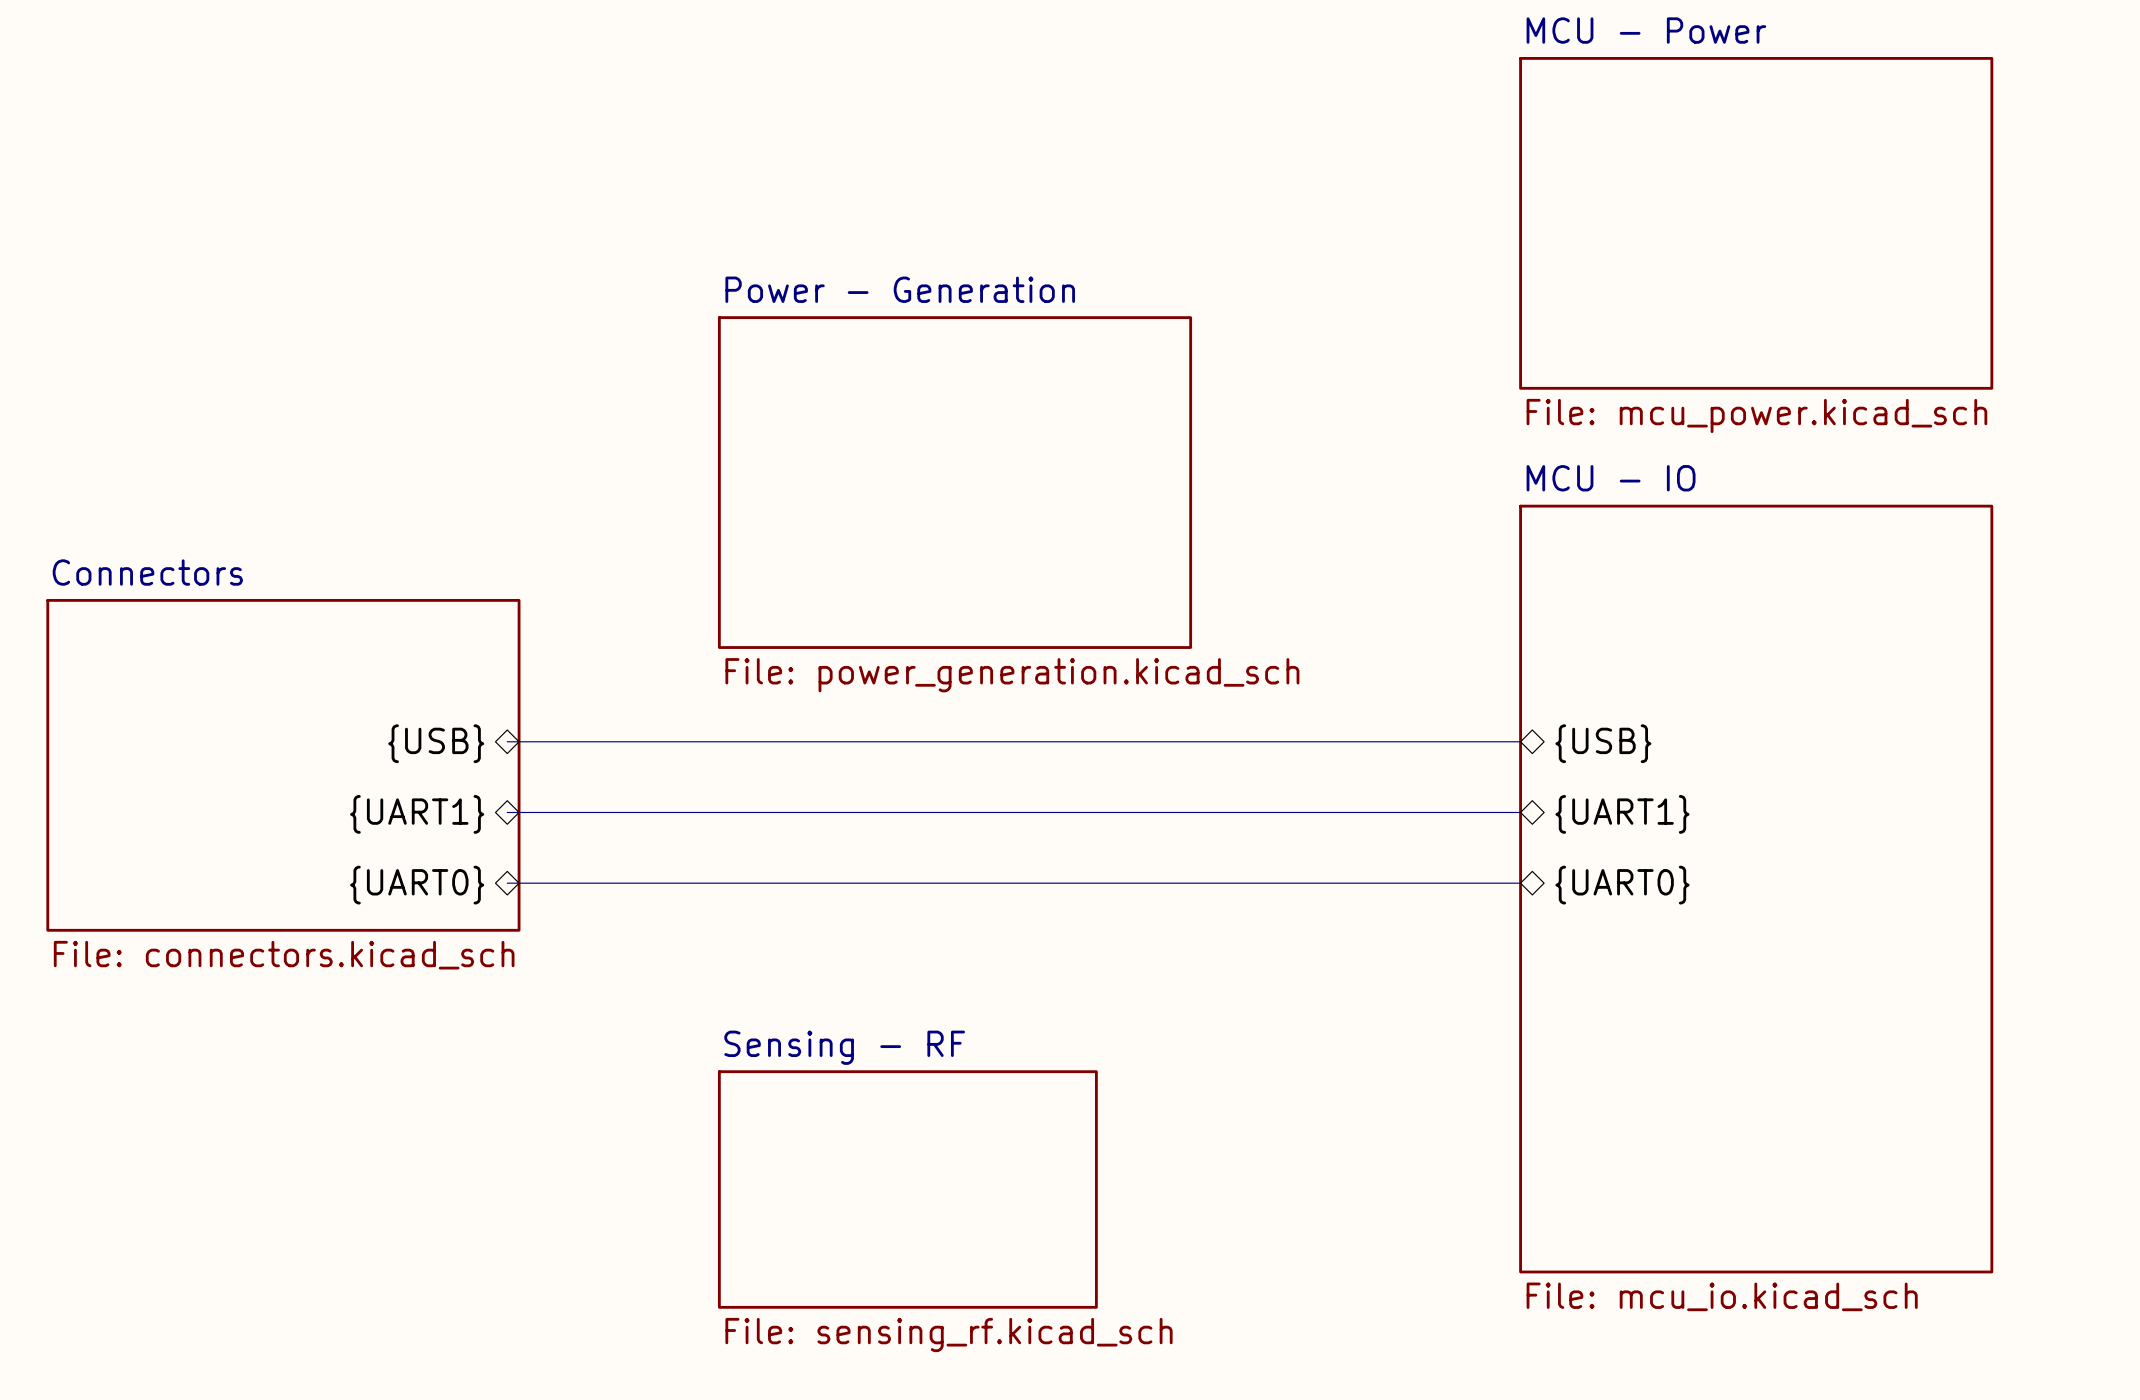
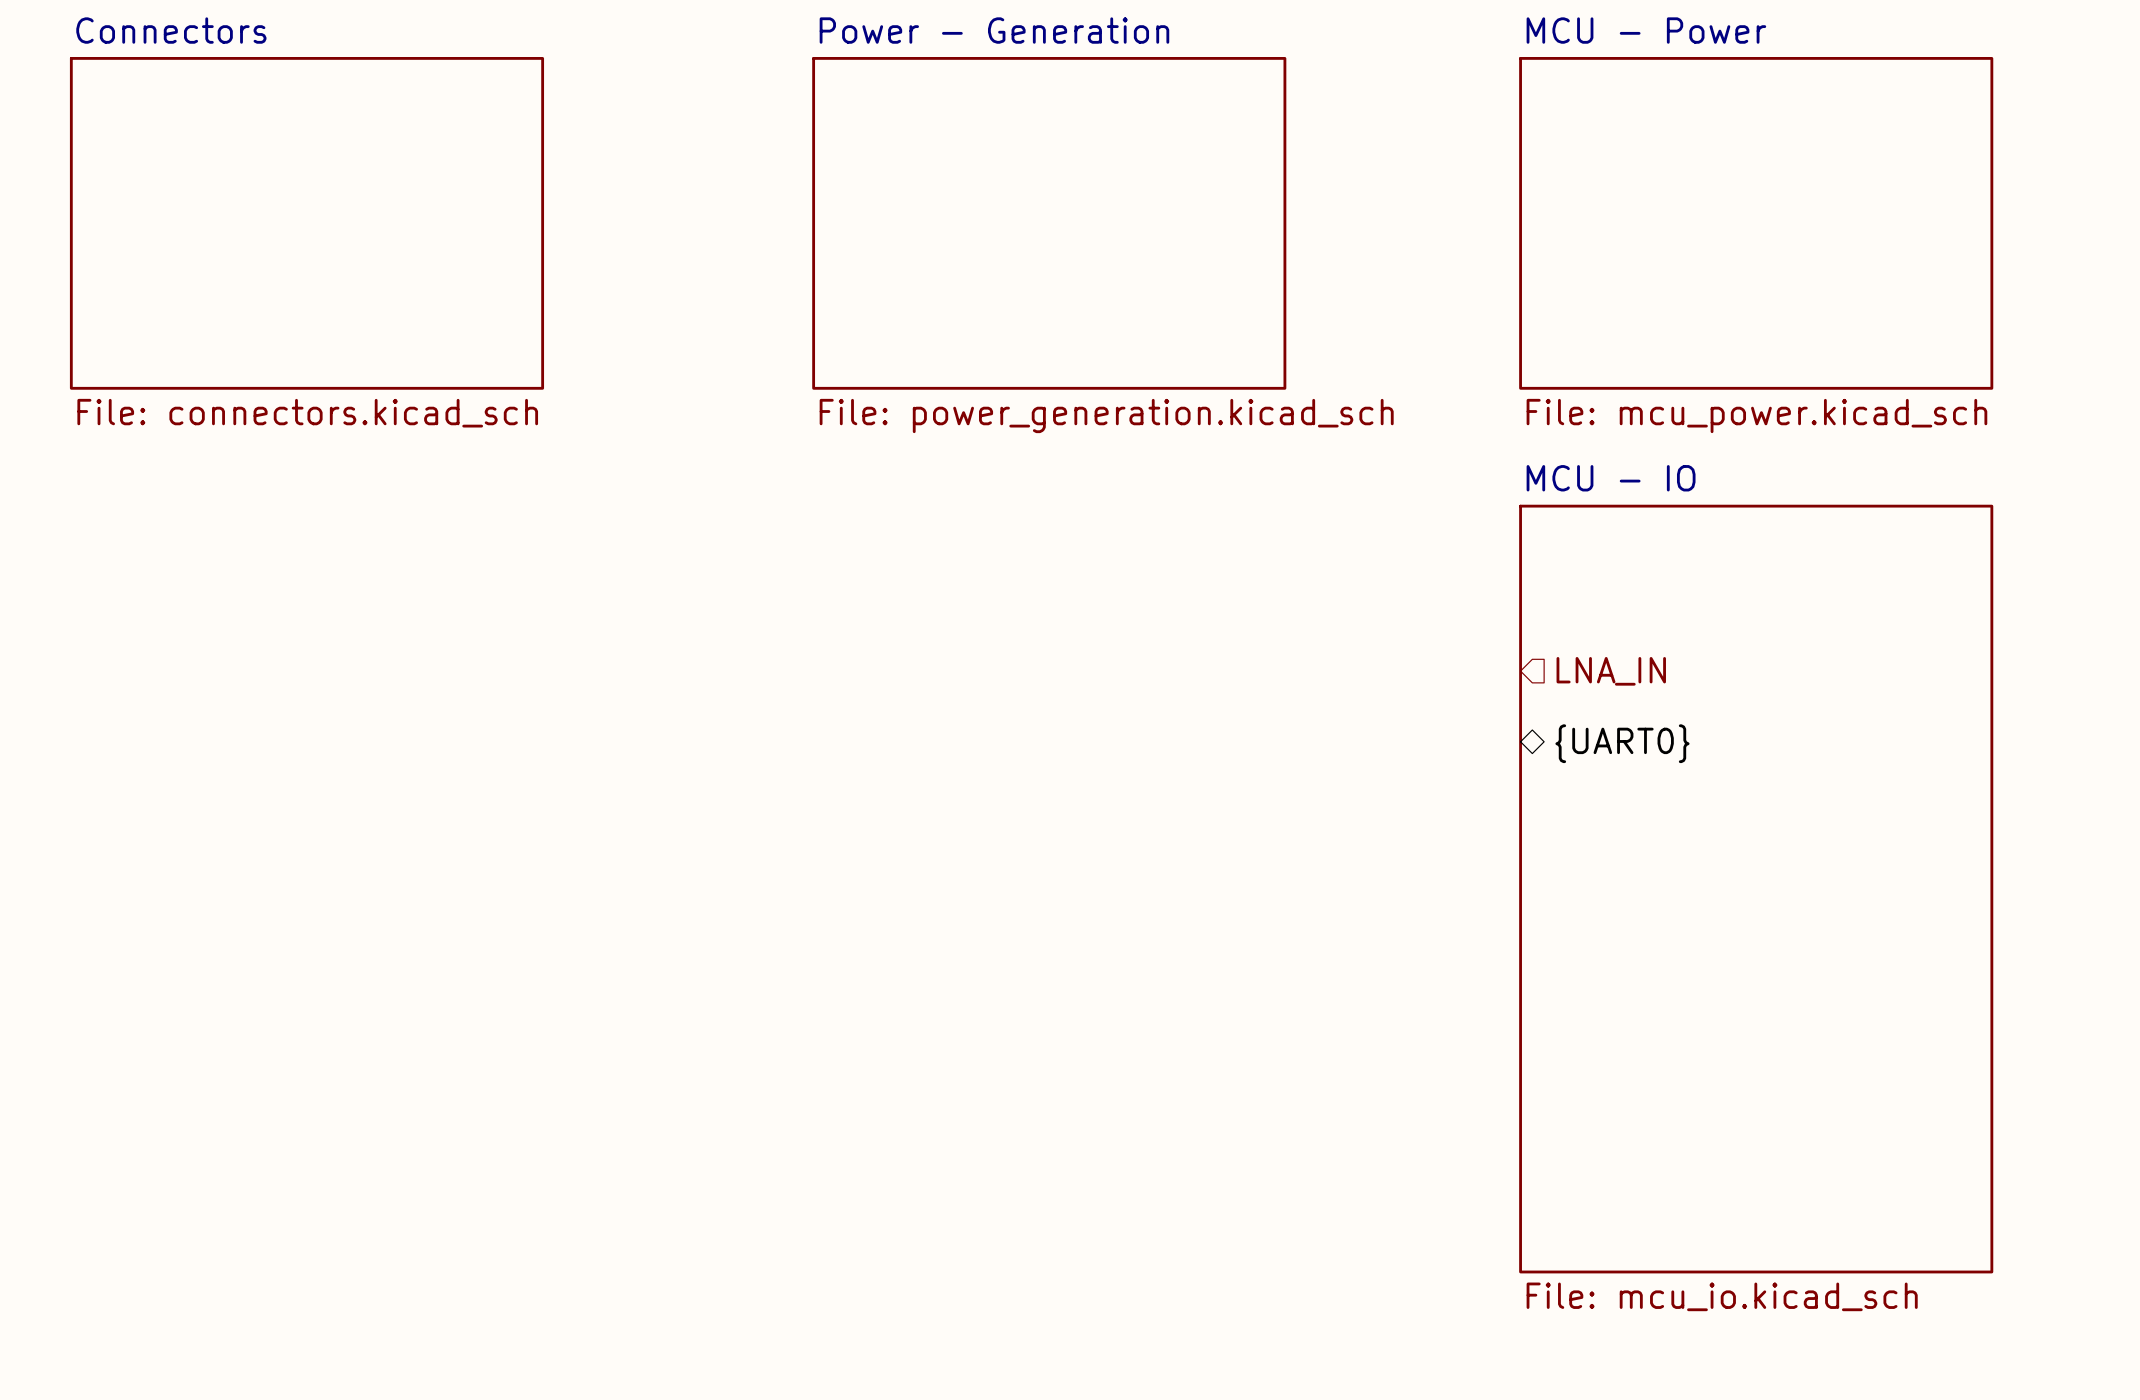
sheet Connectors: none -> File: connectors.kicad_sch (306, 223)
sheet Power - Generation position: (955, 482) -> (1049, 223)
hierarchical label: none -> LNA_IN (1611, 671)
bus: (507, 741) (1520, 741) -> none
sheet pin: {USB} (436, 743) -> none
sheet pin: {USB} (1603, 743) -> {UART0} (1622, 743)
sheet Connectors: File: connectors.kicad_sch (283, 765) -> none
bus: (507, 812) (1520, 812) -> none
sheet pin: {UART1} (417, 814) -> none
sheet pin: {UART1} (1622, 814) -> none
bus: (507, 883) (1520, 883) -> none
sheet pin: {UART0} (417, 885) -> none
sheet pin: {UART0} (1622, 885) -> none
sheet Sensing - RF: File: sensing_rf.kicad_sch (907, 1189) -> none

